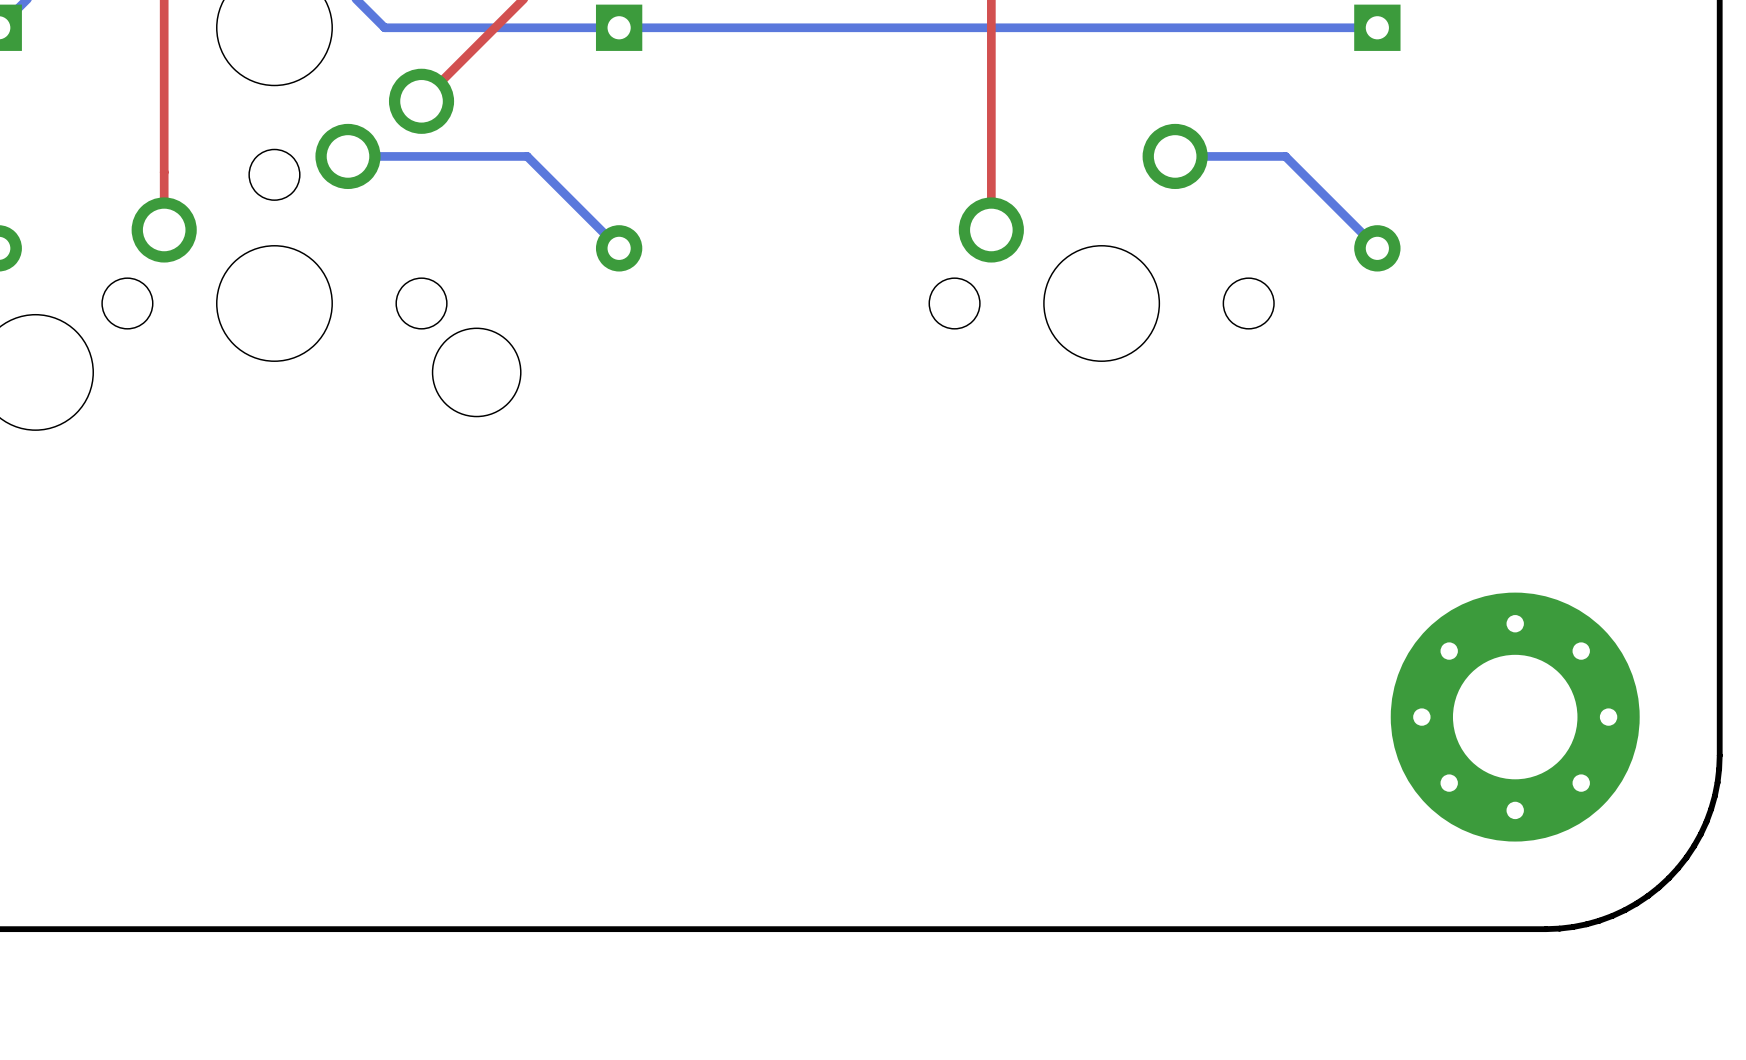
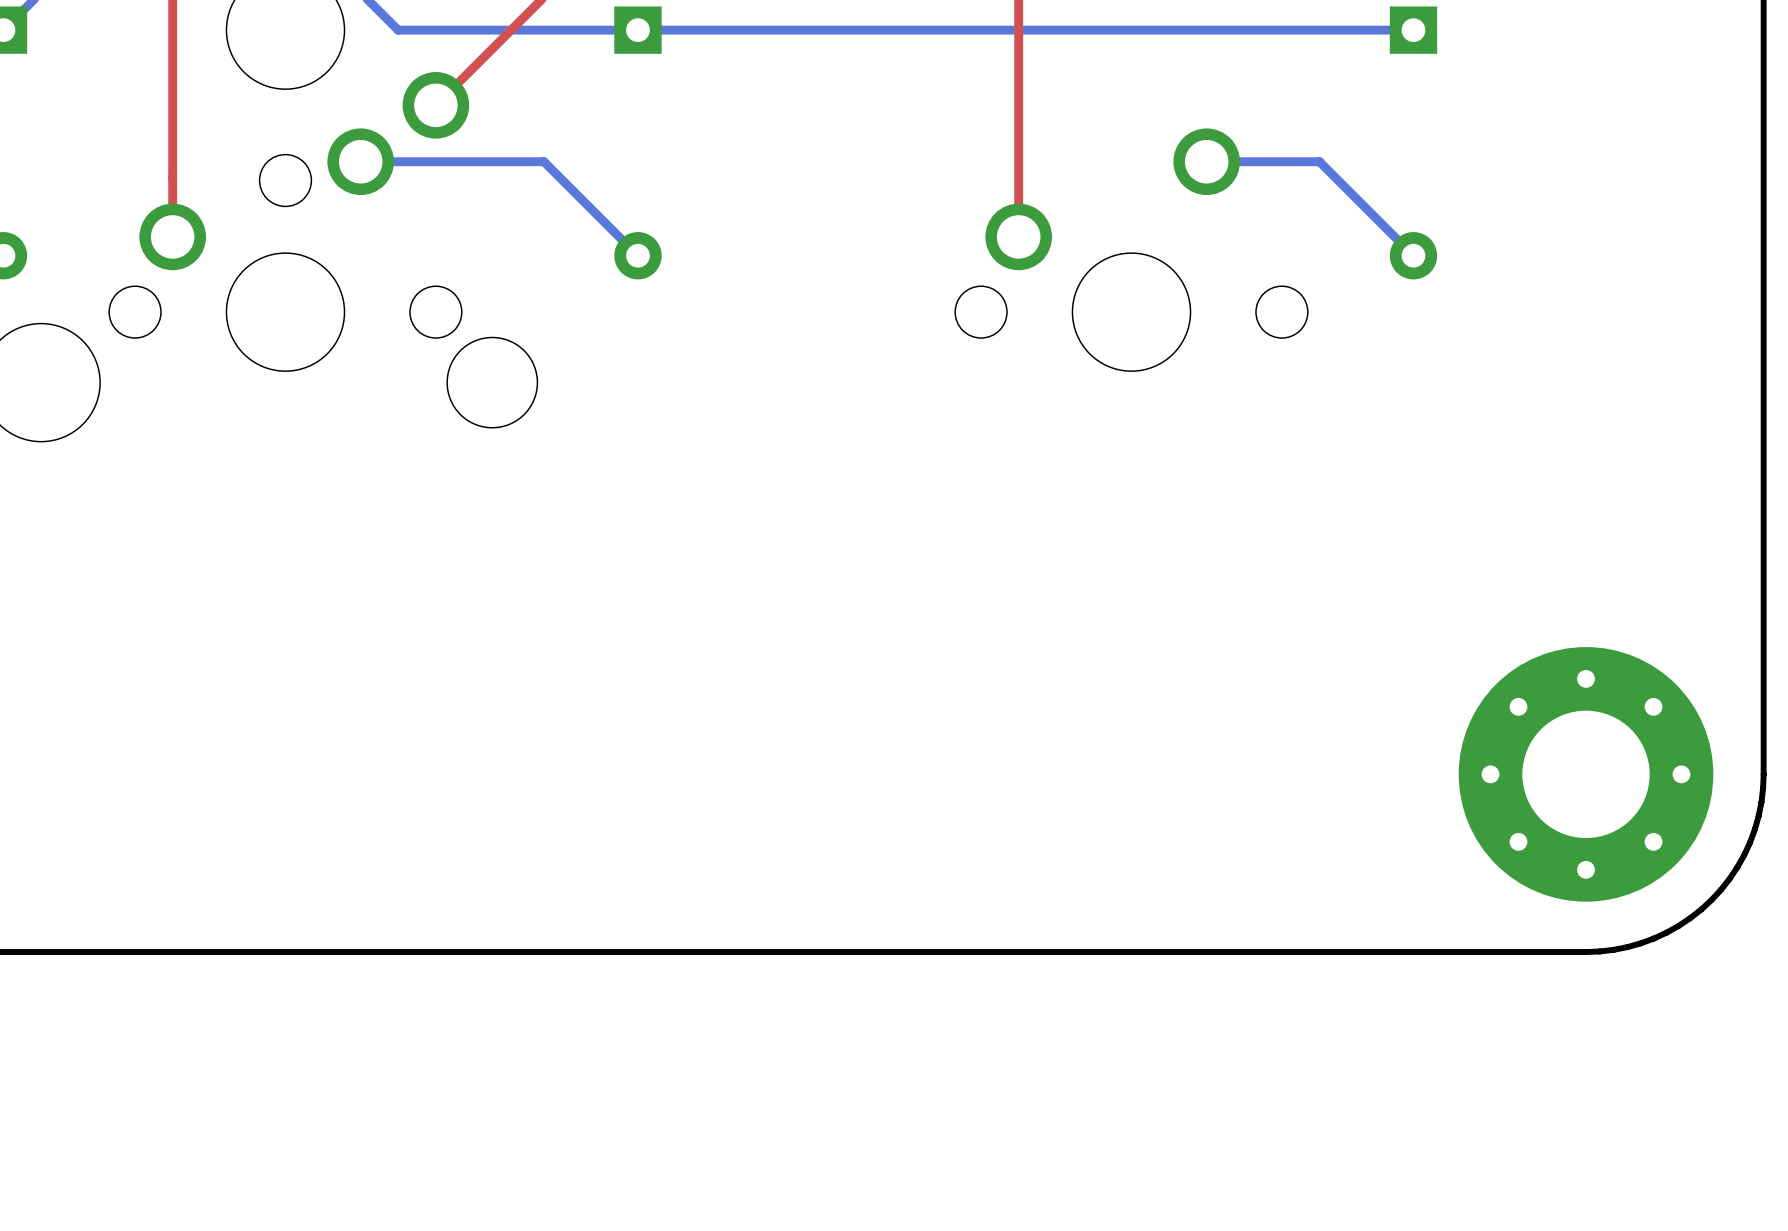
part position: (1515, 717) -> (1586, 774)

